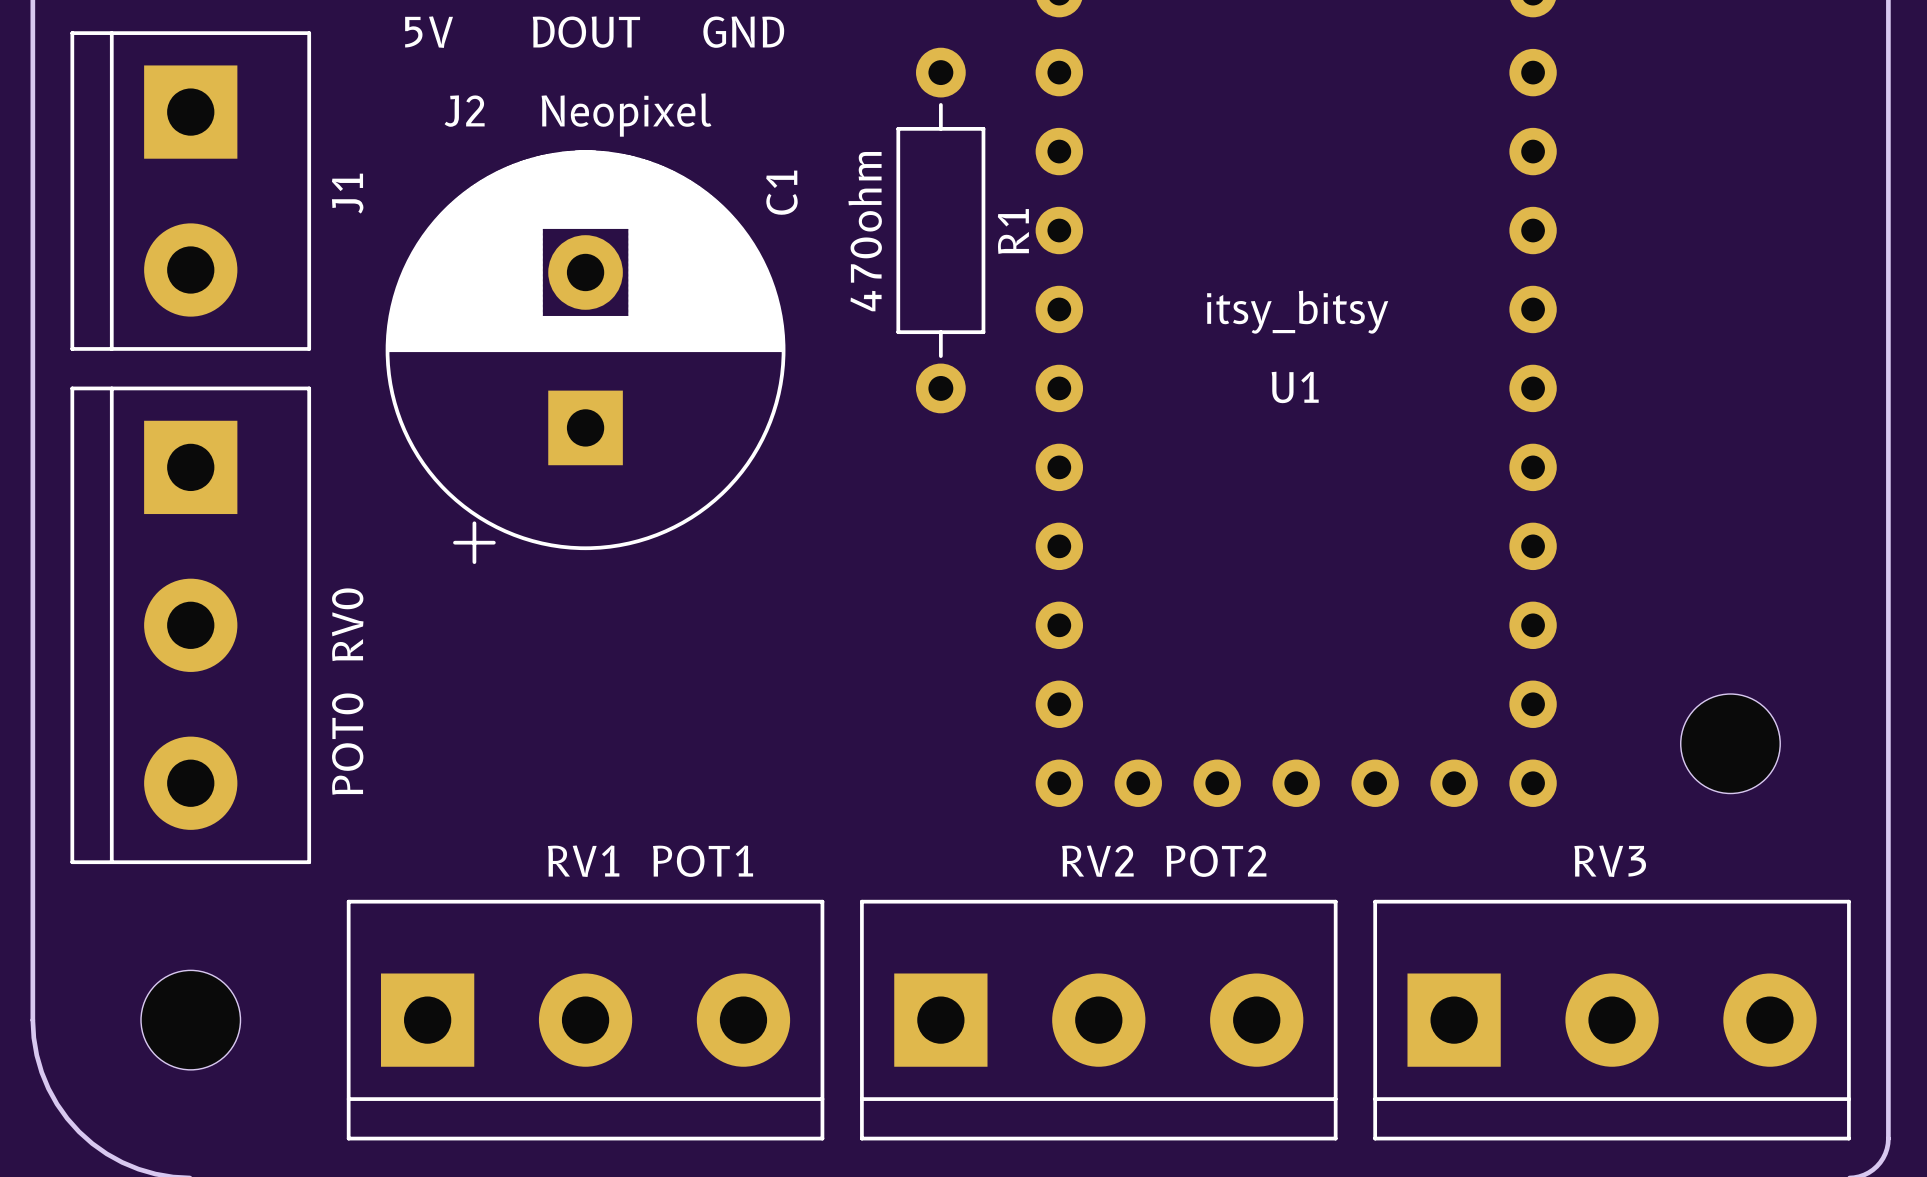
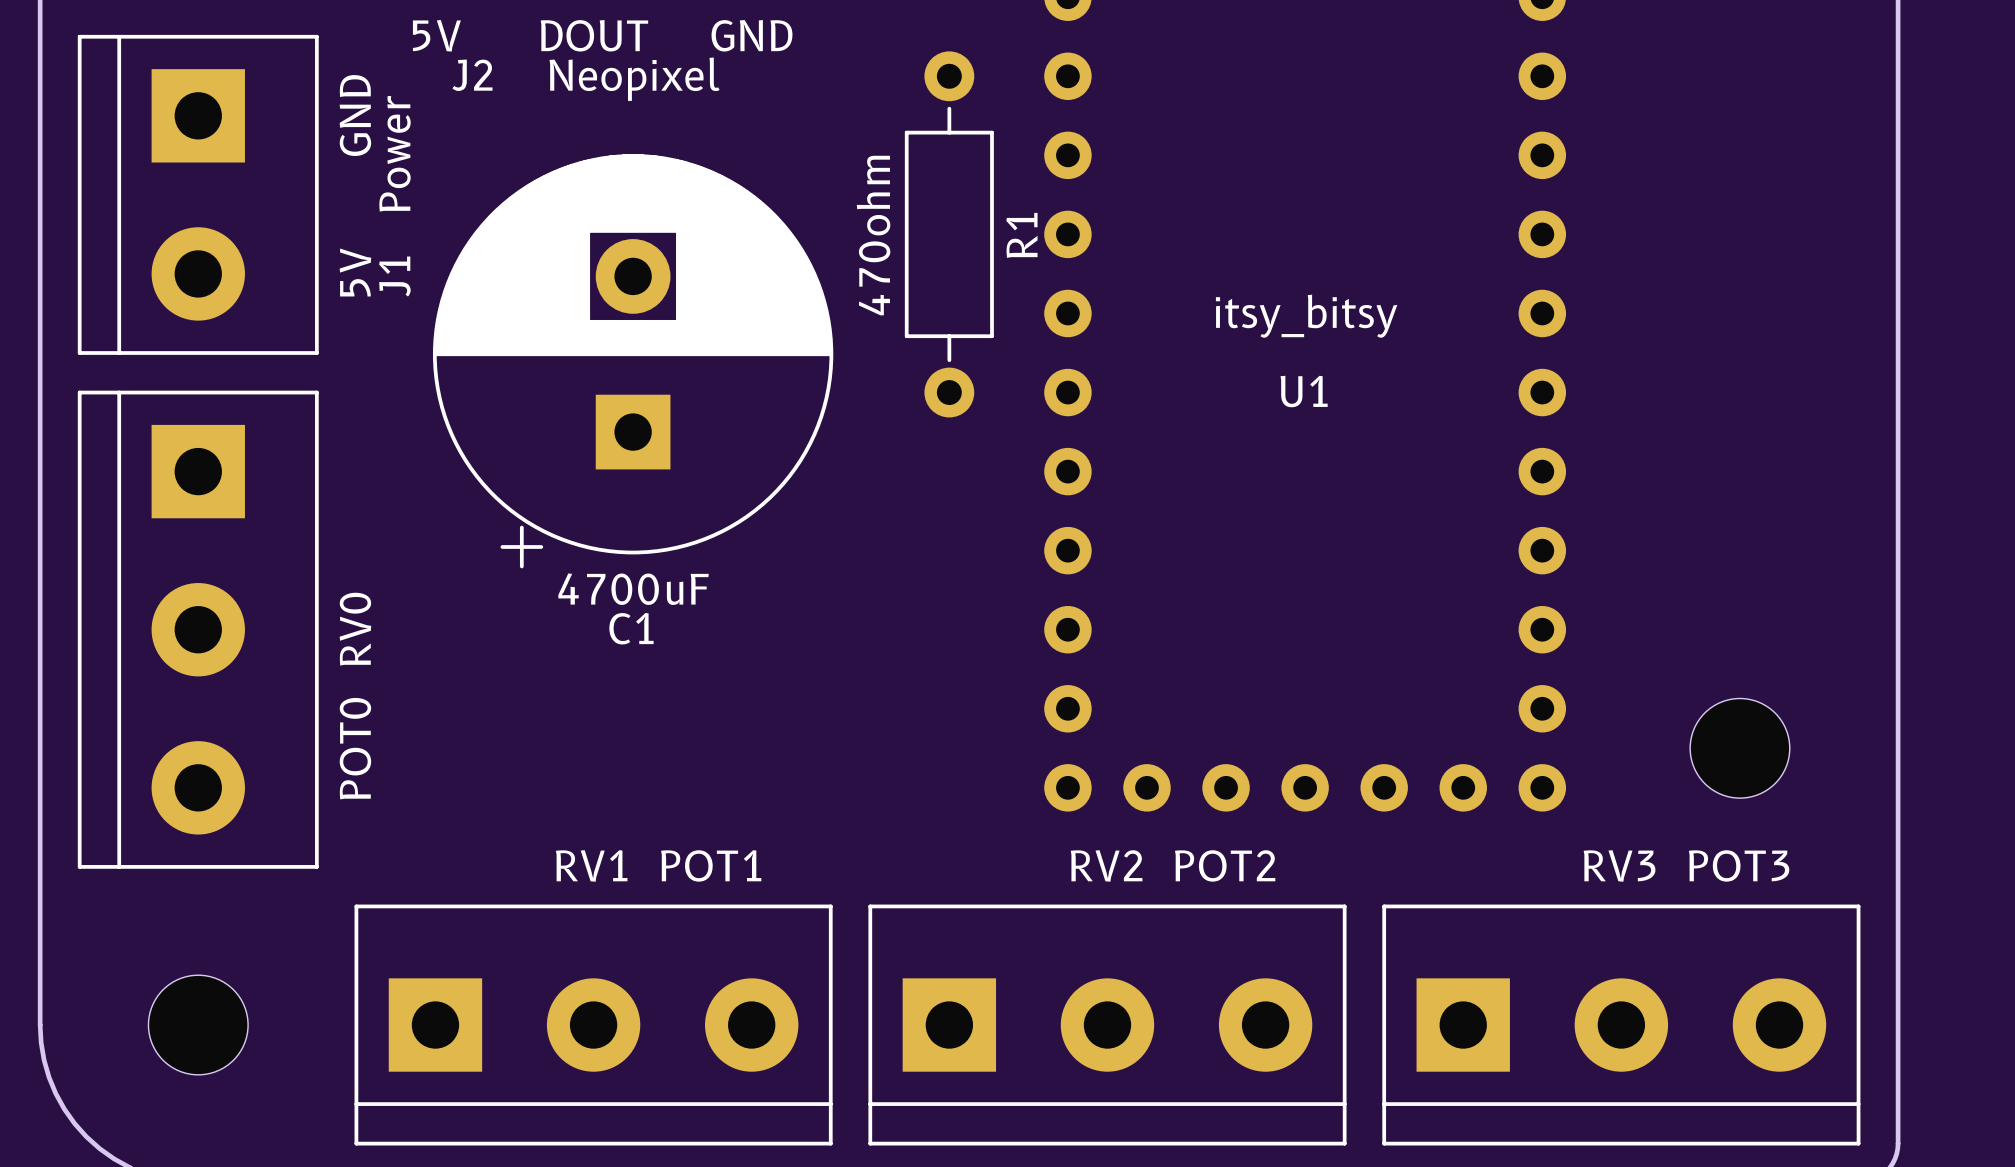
J1 text: none -> GND (355, 115)
J2 name position: J2 (464, 111) -> J2 (472, 75)
J2 value position: Neopixel (626, 115) -> Neopixel (634, 79)
J1 value: none -> Power (395, 153)
C1 name rotation: 0° (781, 192) -> 90° clockwise (631, 628)
C1 name position: C1 (781, 192) -> C1 (631, 628)
J1 name position: J1 (347, 193) -> J1 (394, 276)
J1 text: none -> 5V (355, 272)
C1 position: (585, 357) -> (633, 361)
C1 value: none -> 4700uF (633, 589)
RV3 value: none -> POT3 (1739, 865)

